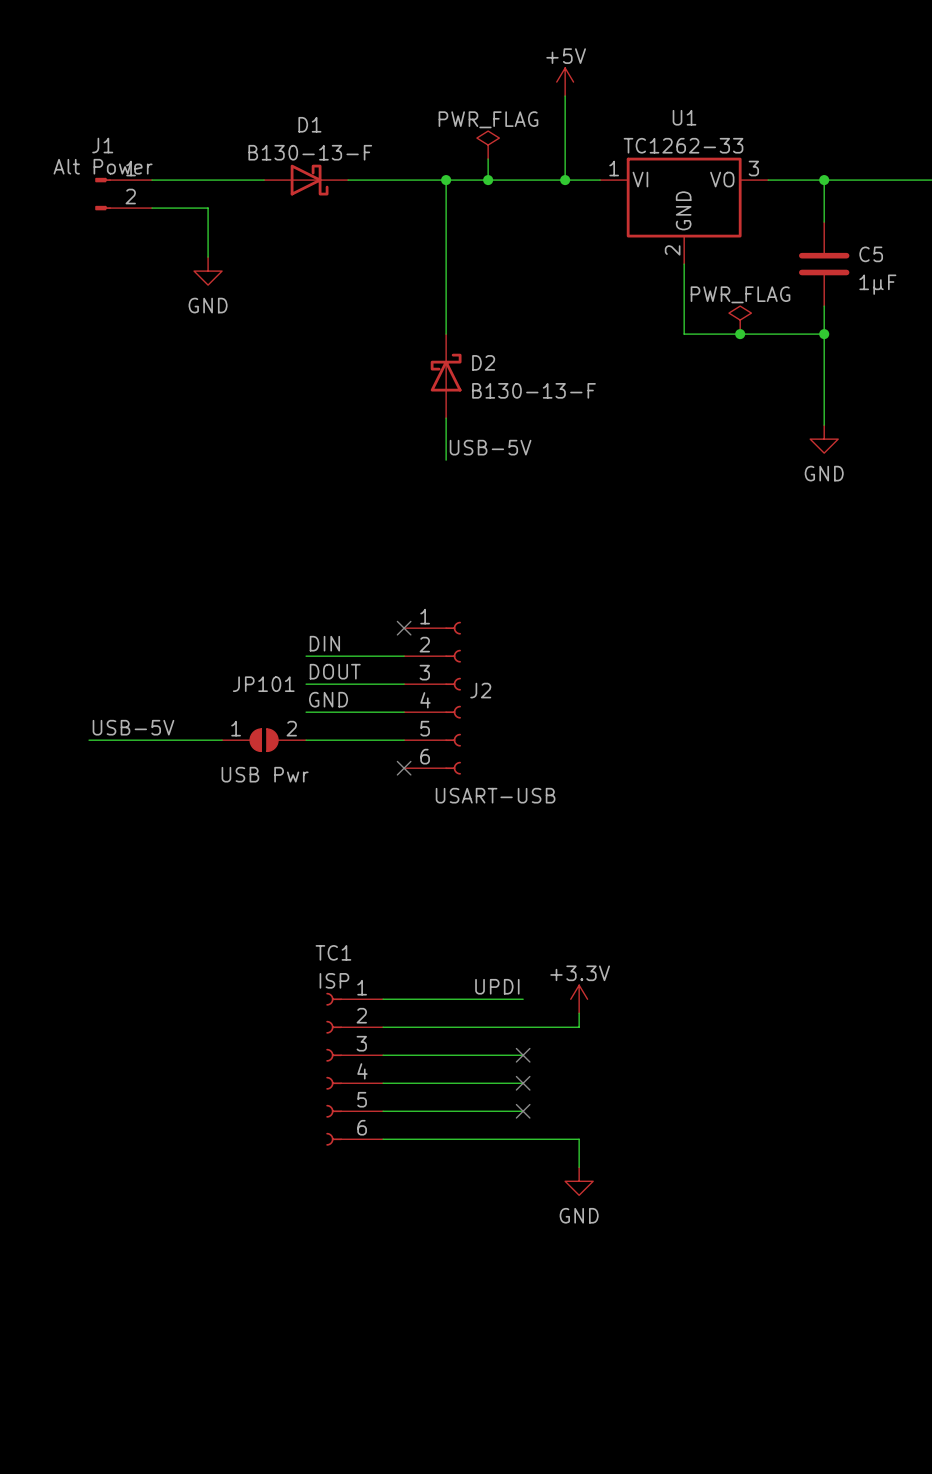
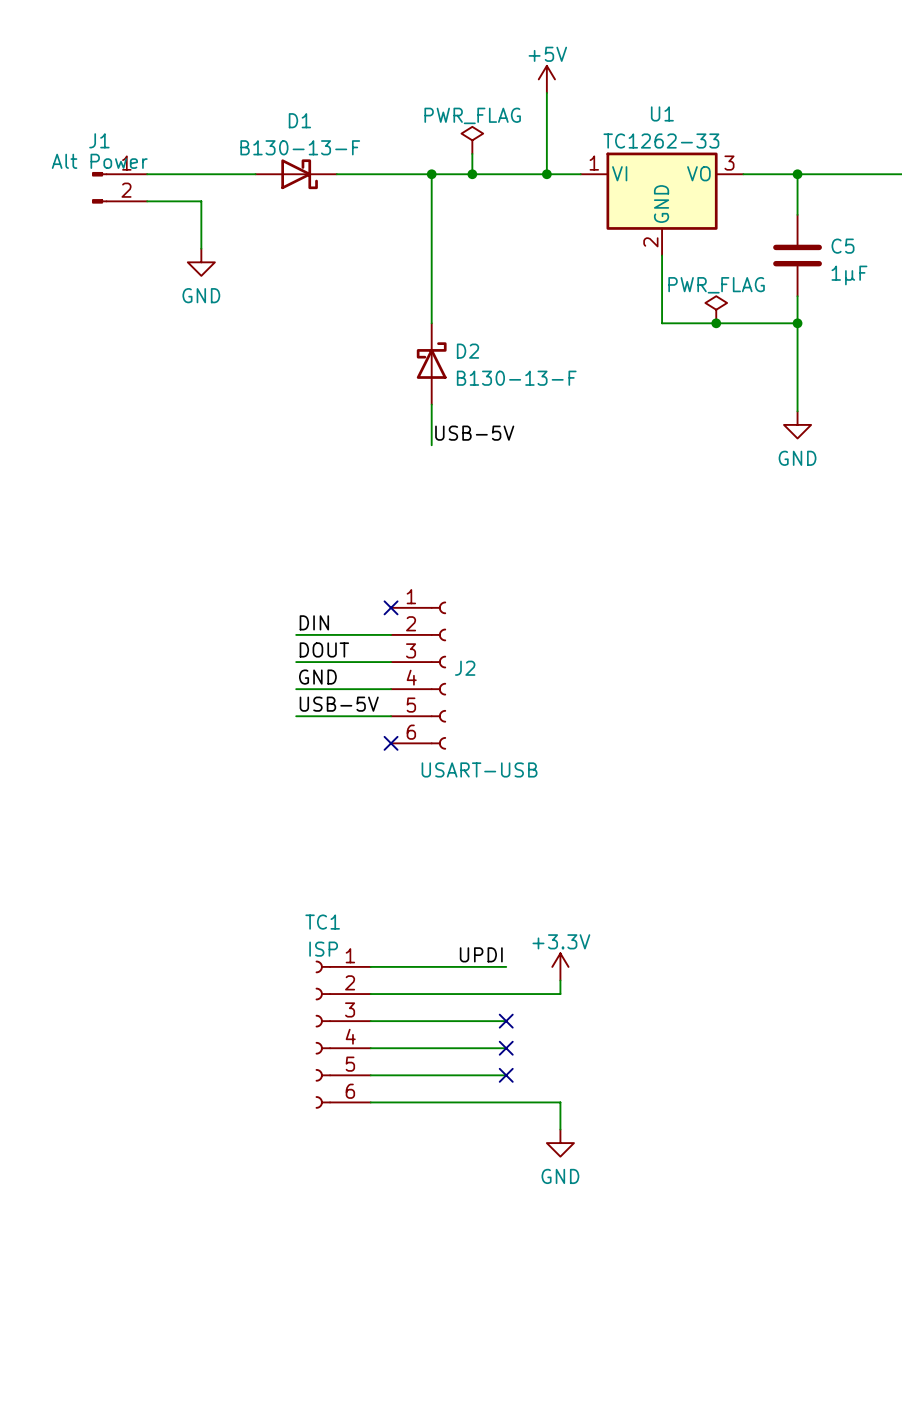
label position: USB-5V (133, 727) -> USB-5V (339, 704)
wire: (89, 740) (222, 740) -> none
JP101: USB Pwr (264, 740) -> none

